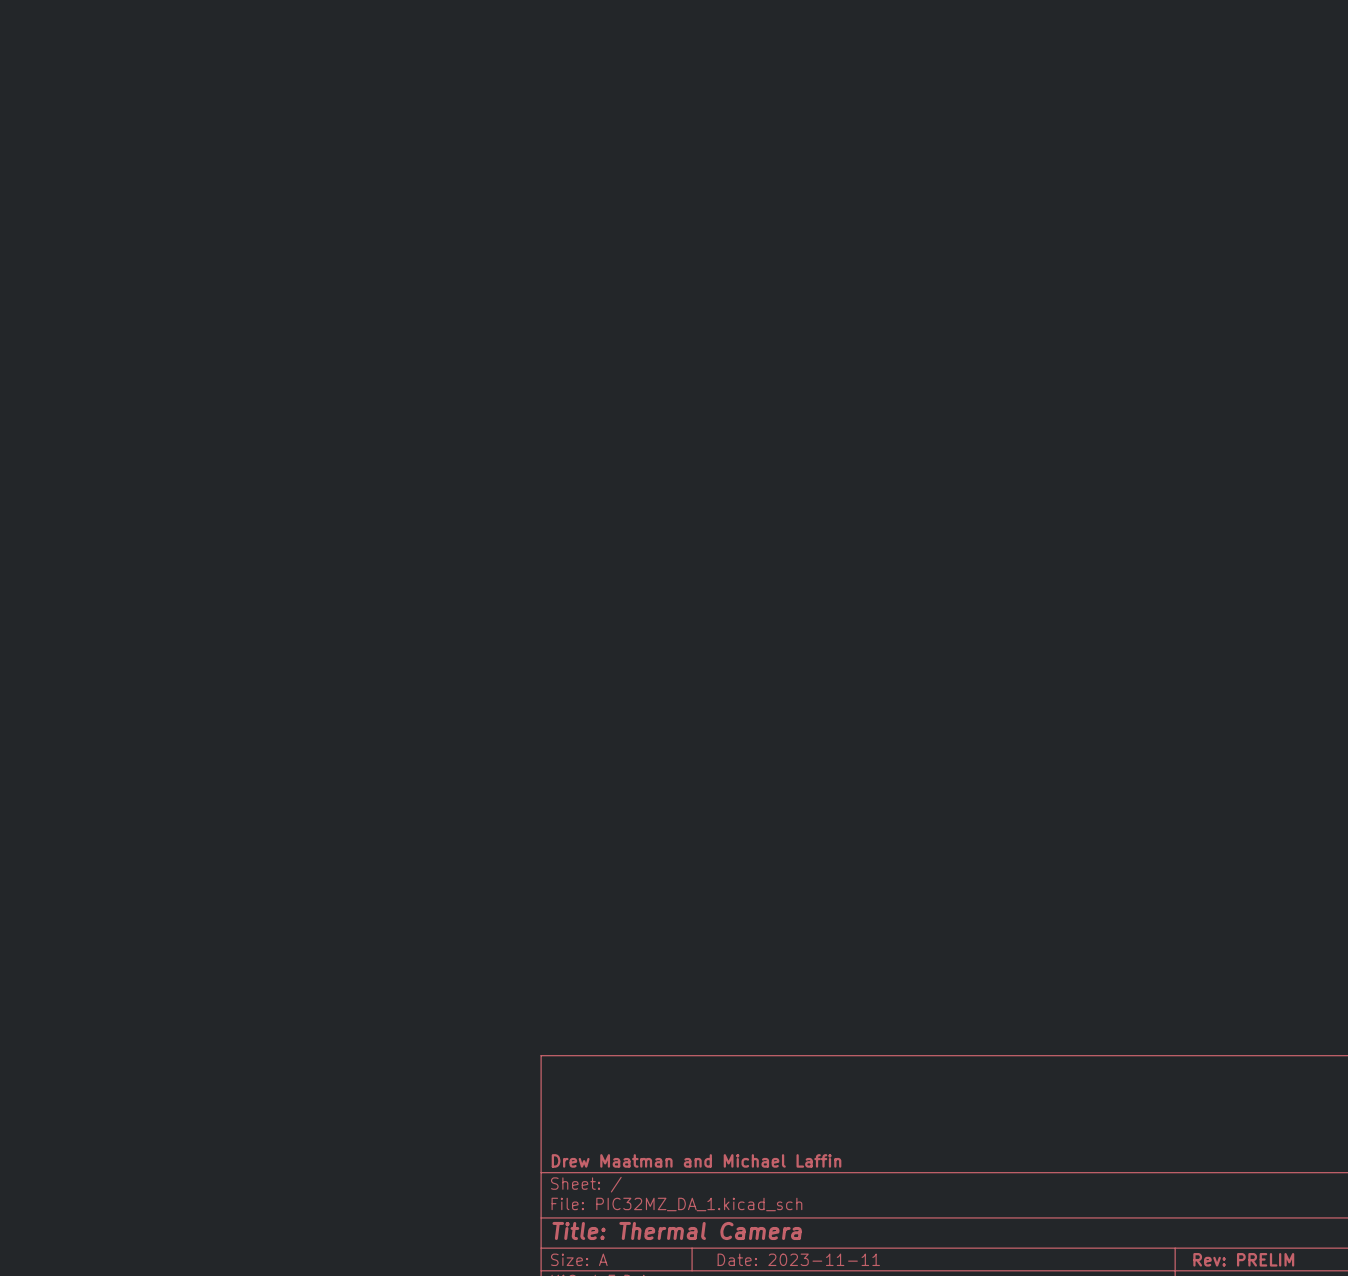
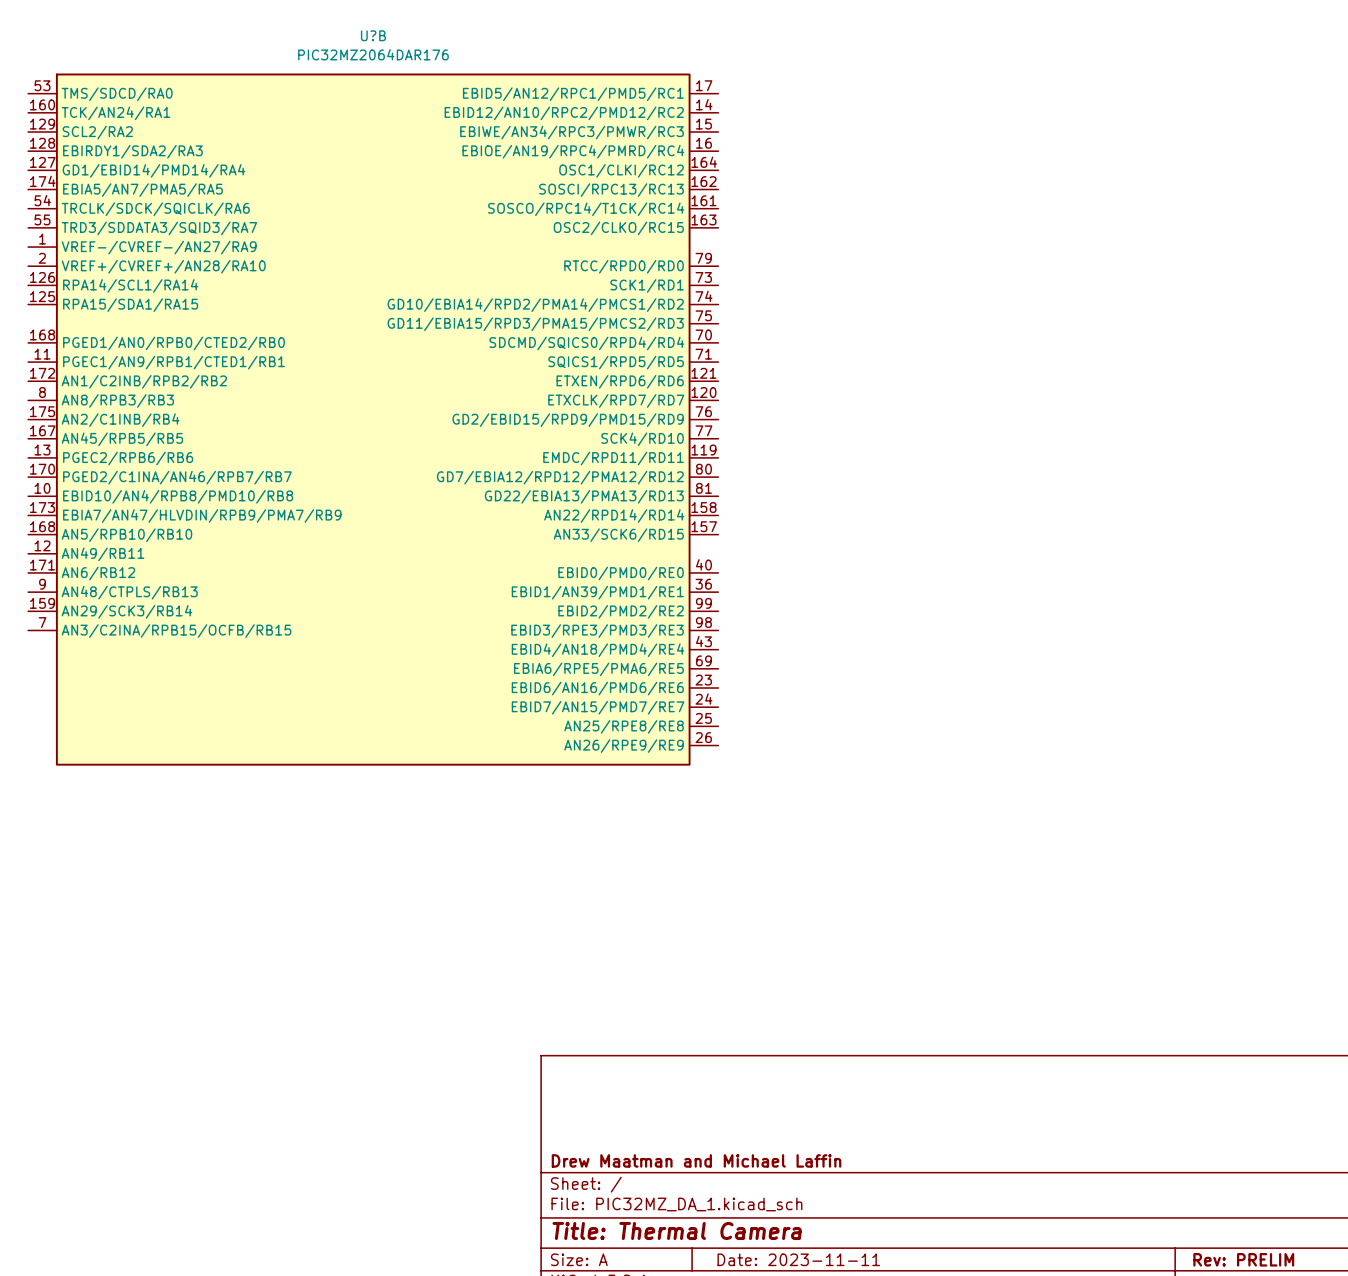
U?B: none -> PIC32MZ2064DAR176 (373, 419)

